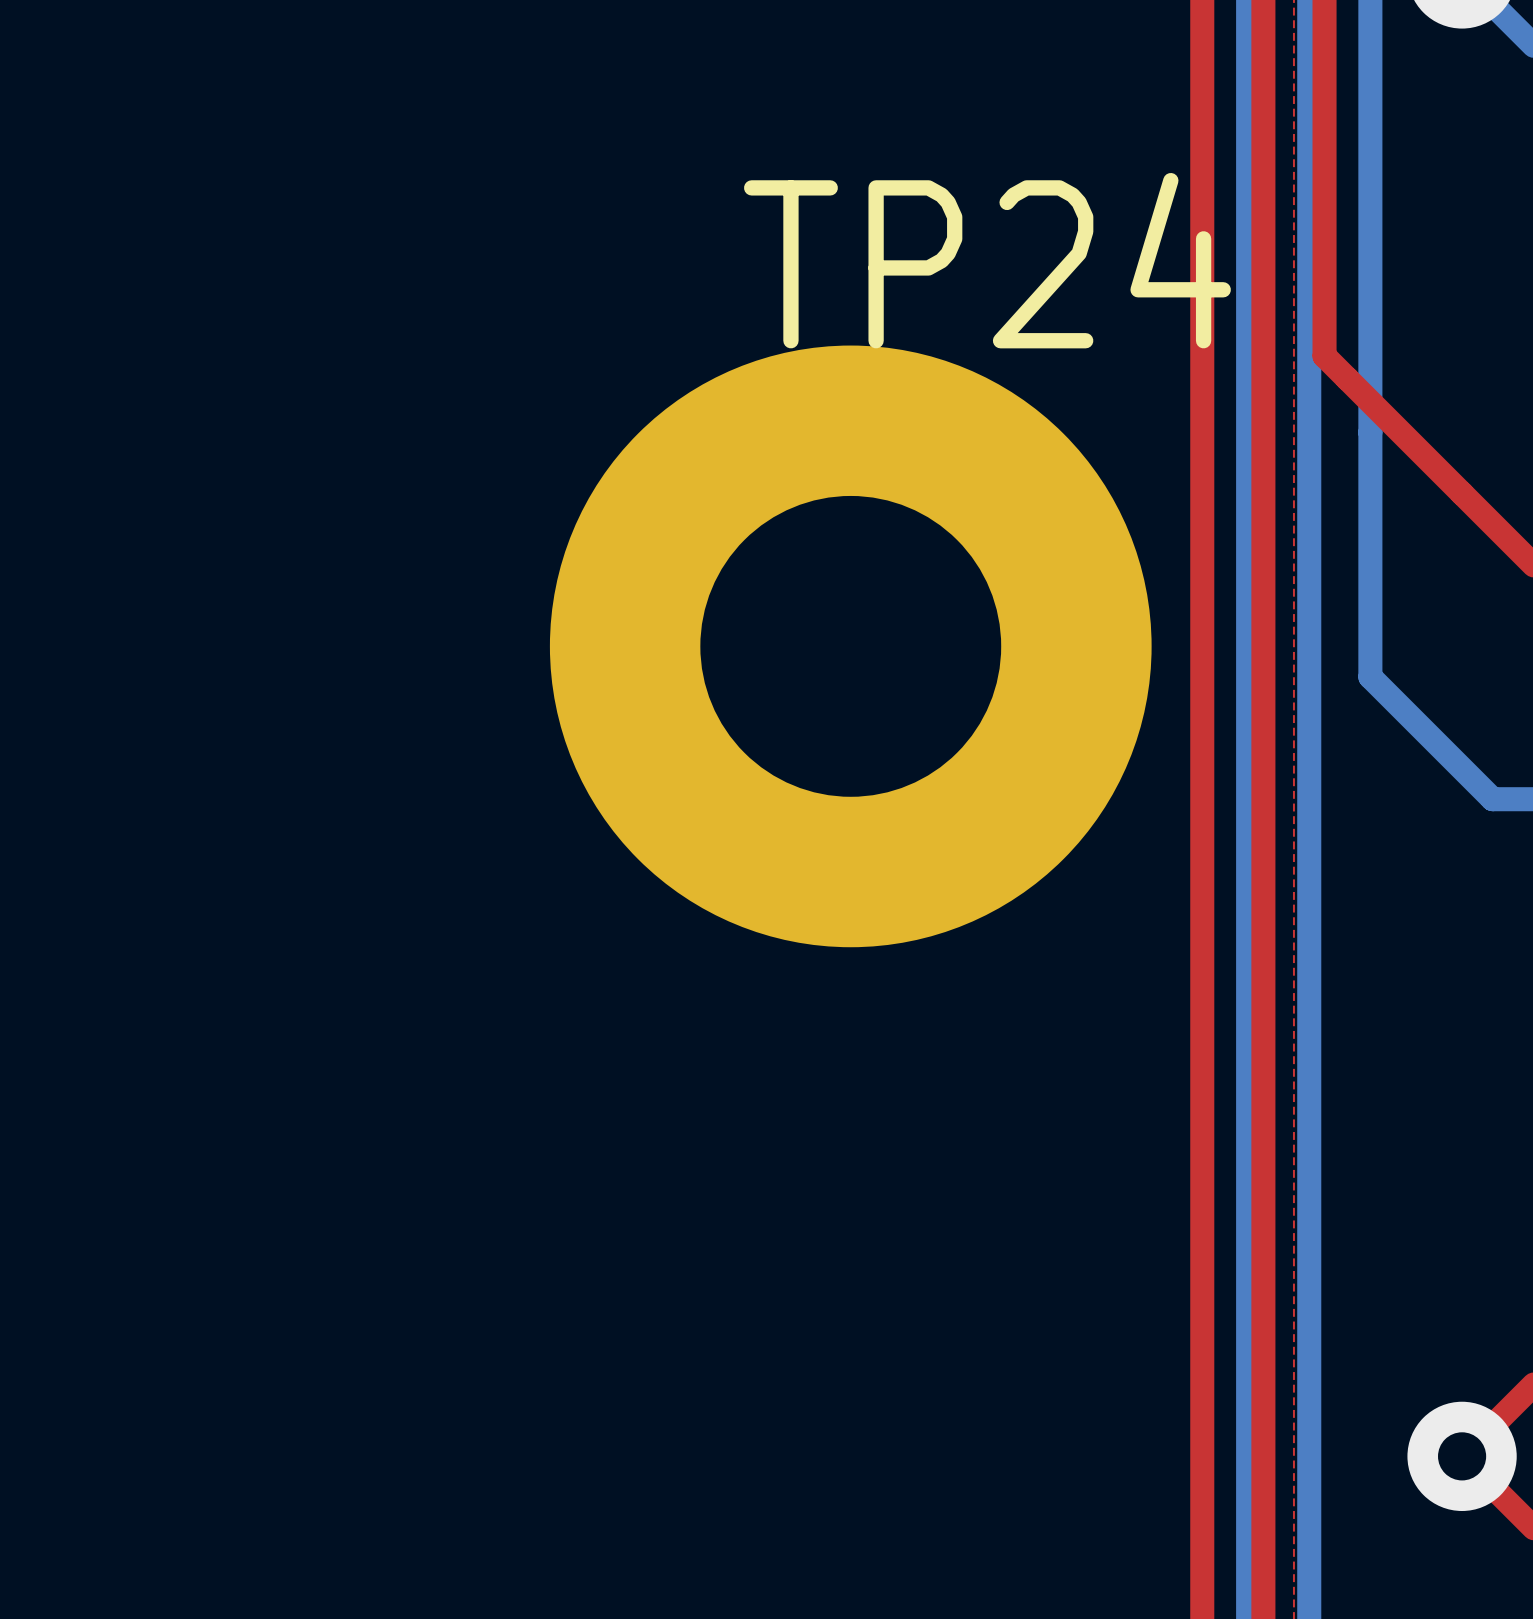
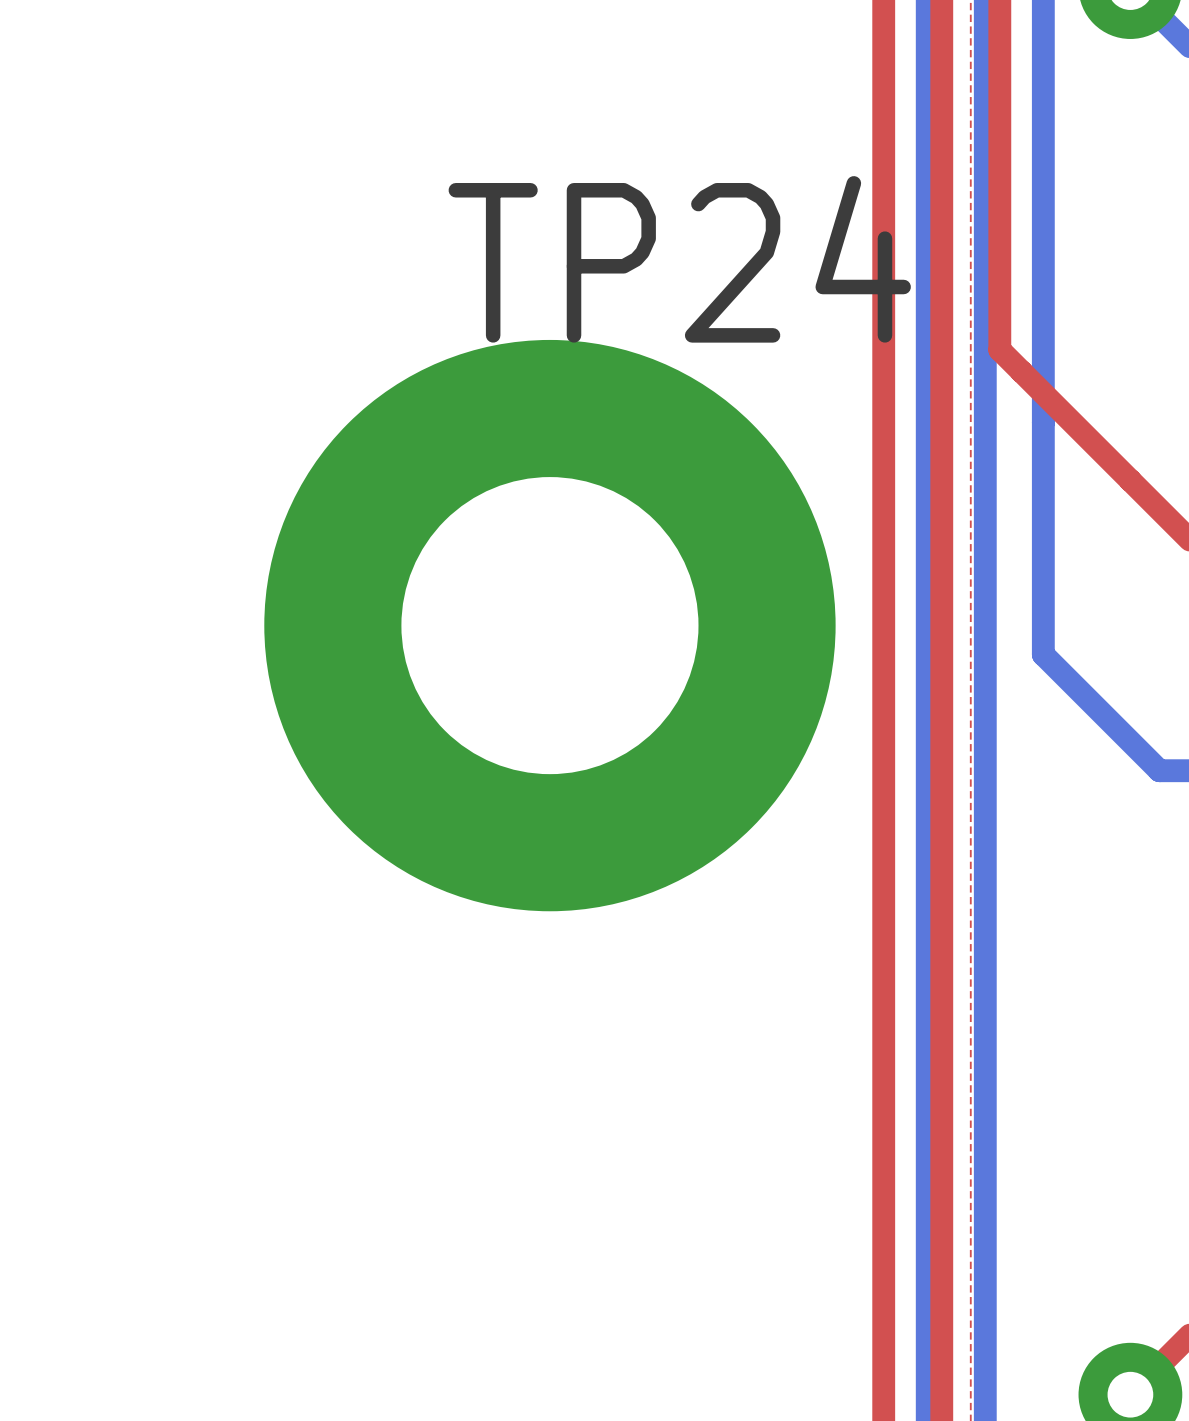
TP24 footprint: [549, 345, 1152, 948] -> [264, 339, 836, 912]

